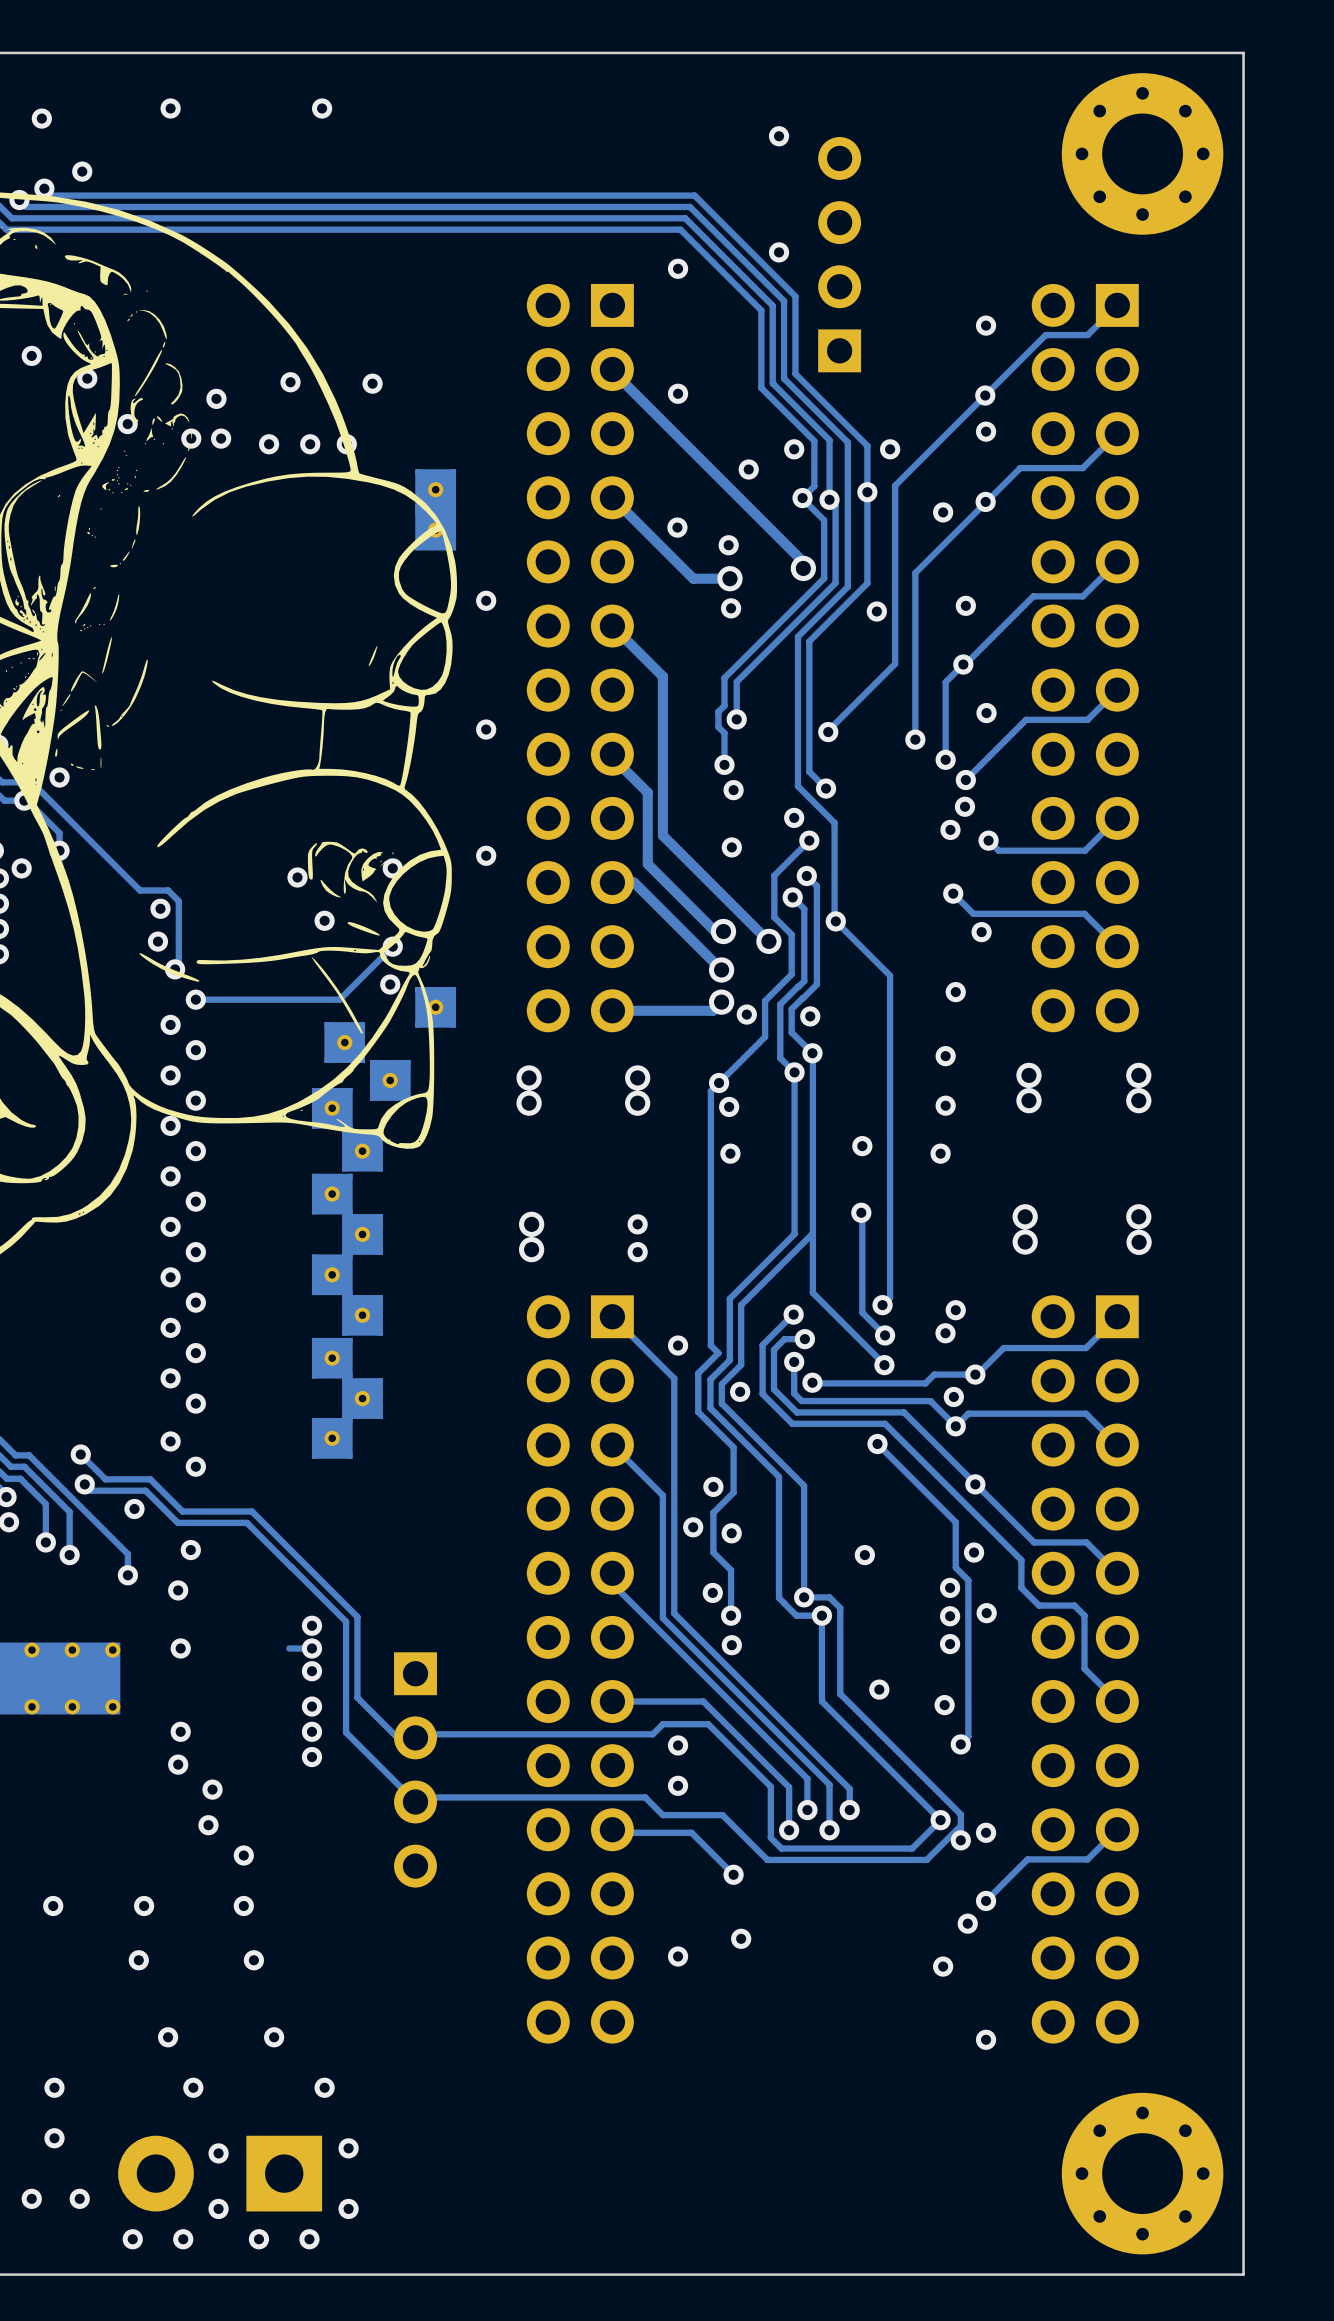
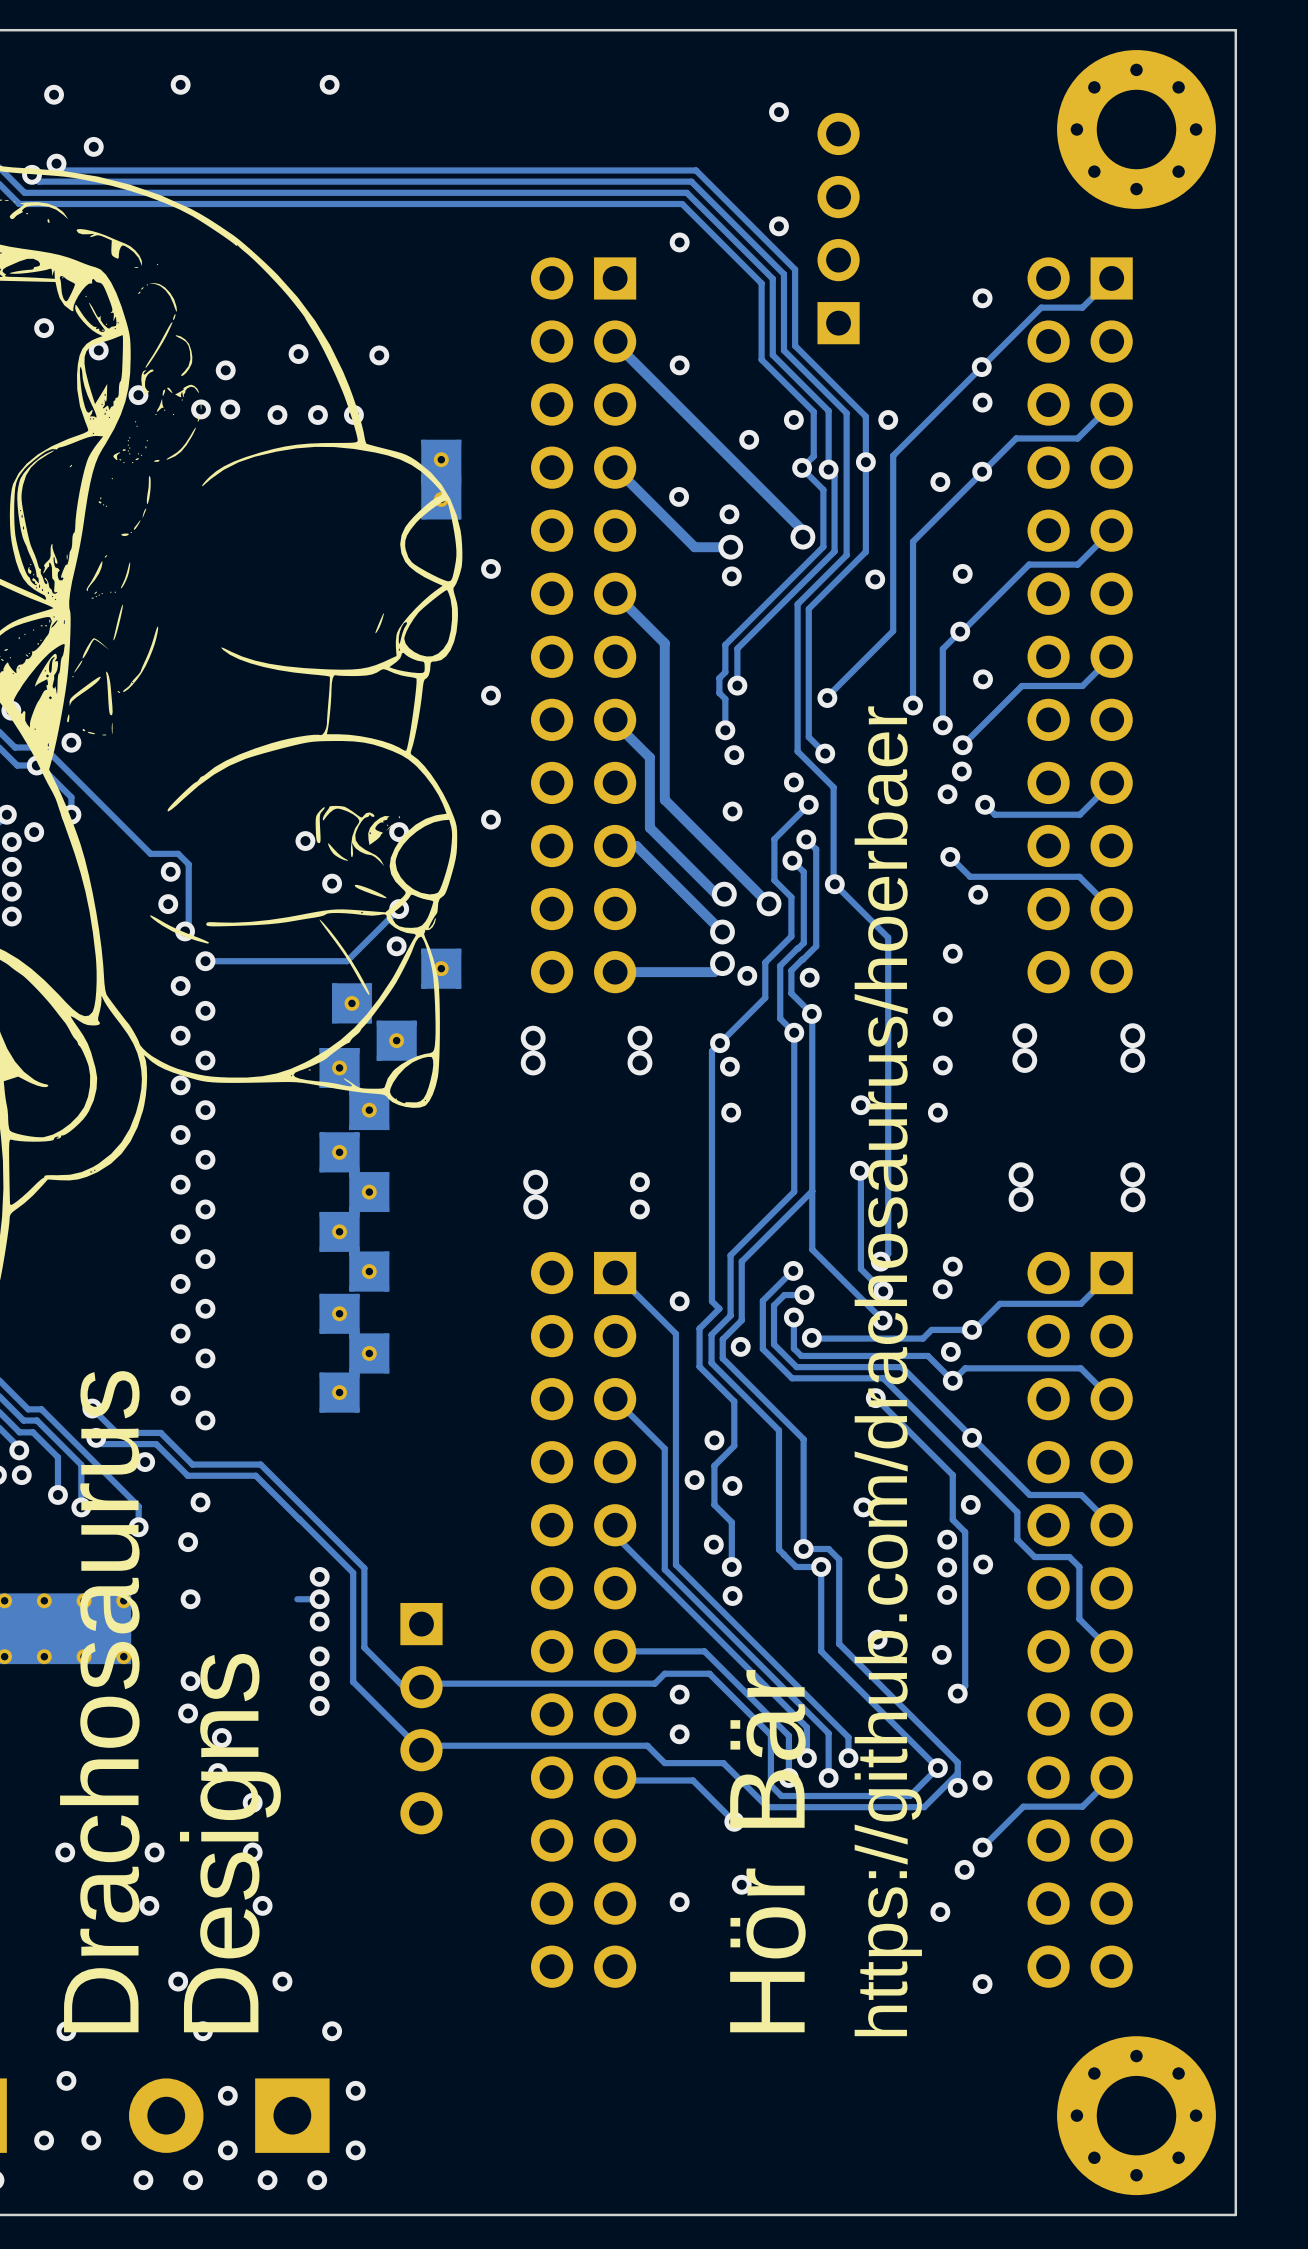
text: none -> https://github.com/drachosaurus/hoerbaer (888, 1371)
text: none -> Drachosaurus (99, 1701)
text: none -> Designs (230, 1843)
text: none -> Hör Bär (767, 1851)

